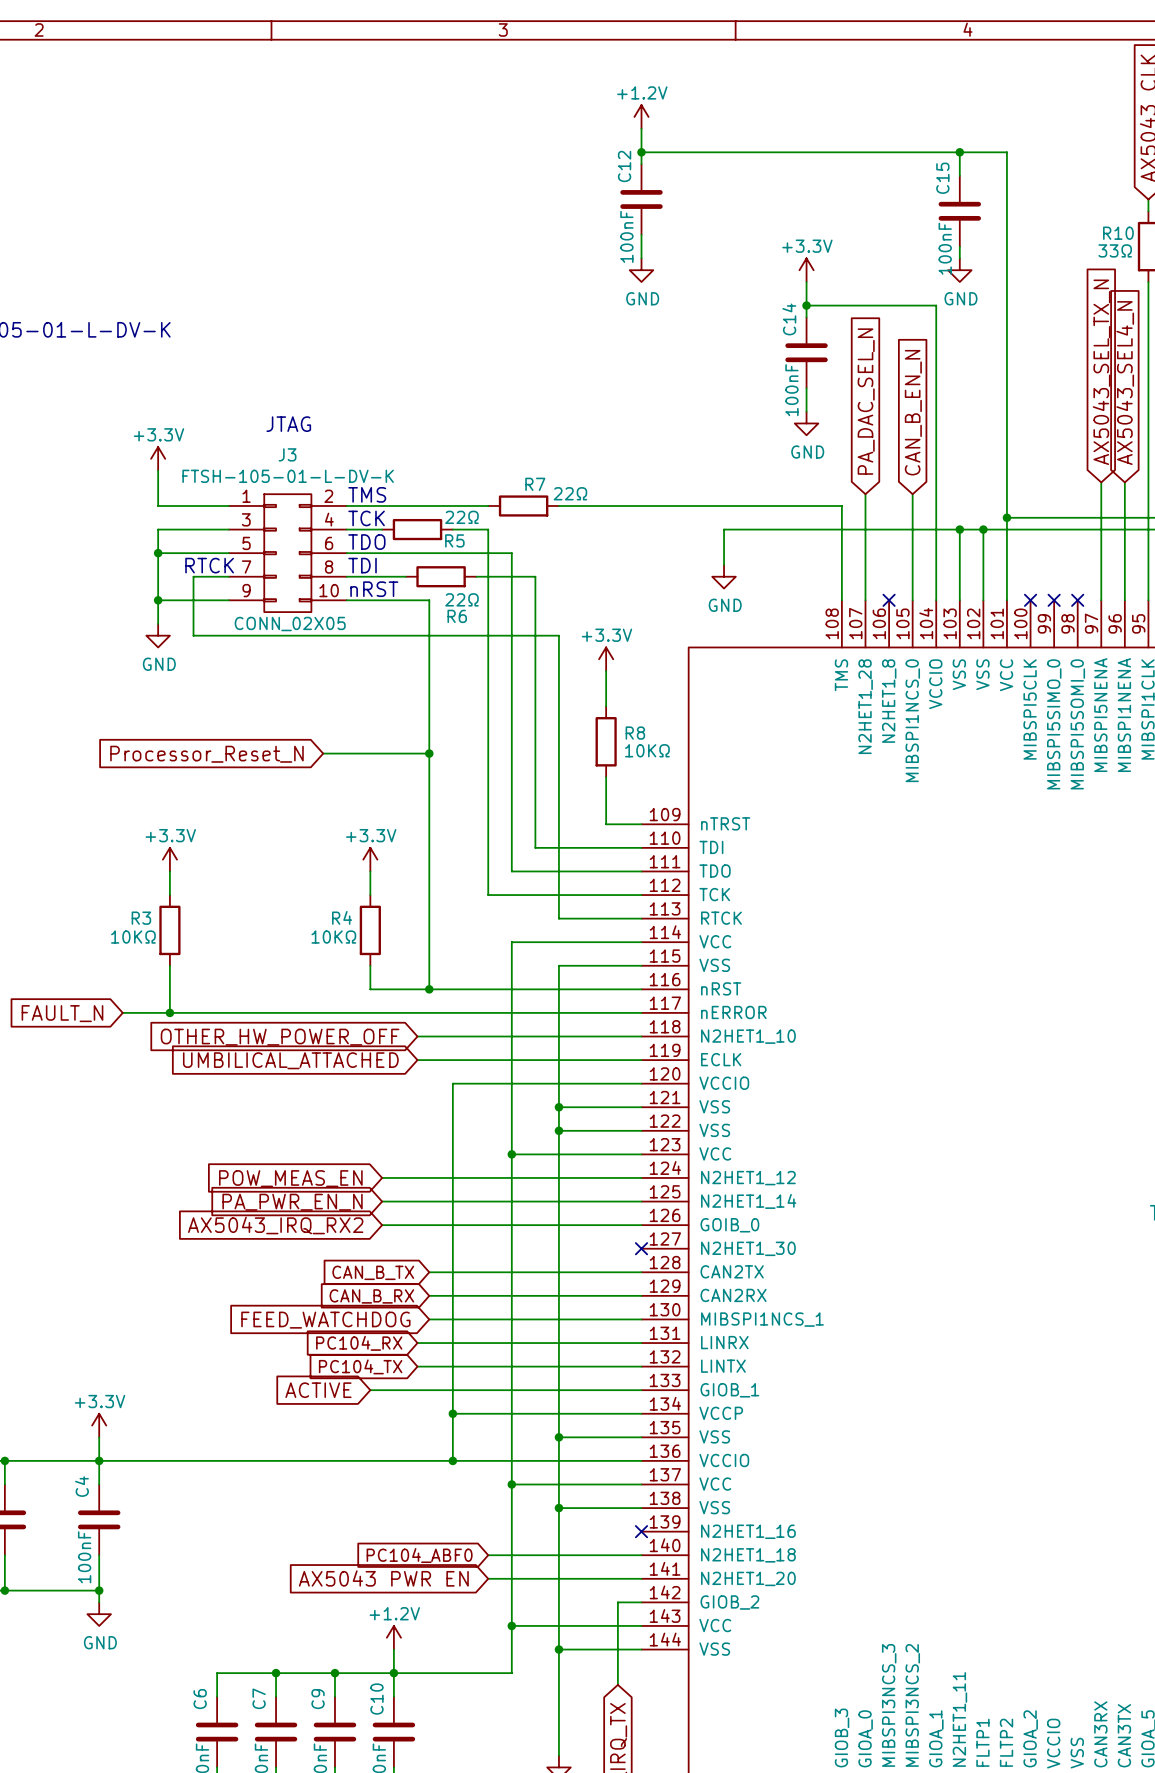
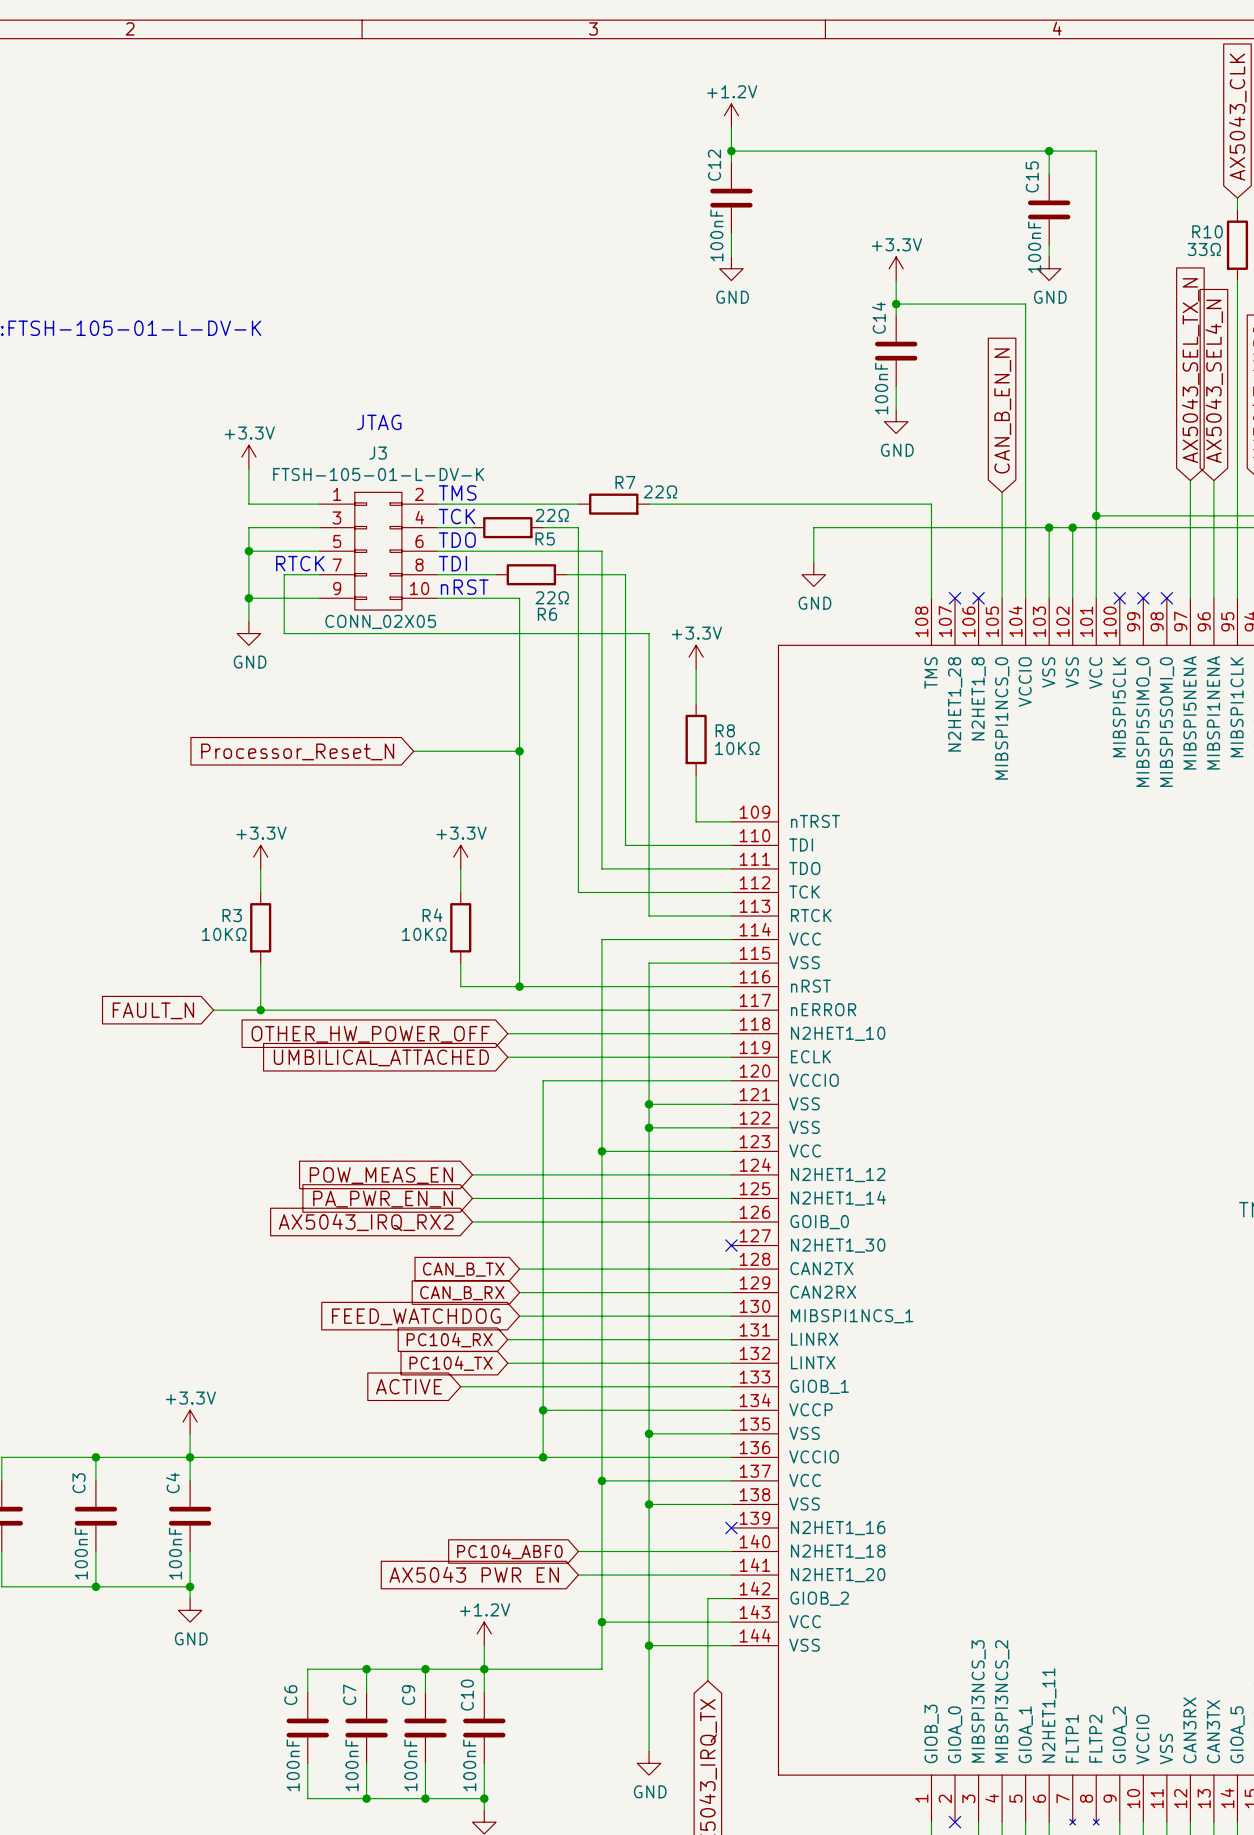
global label: PA_DAC_SEL_N (866, 401) -> none
wire: (865, 494) (865, 600) -> none
no-connect mark: none -> (955, 598)

